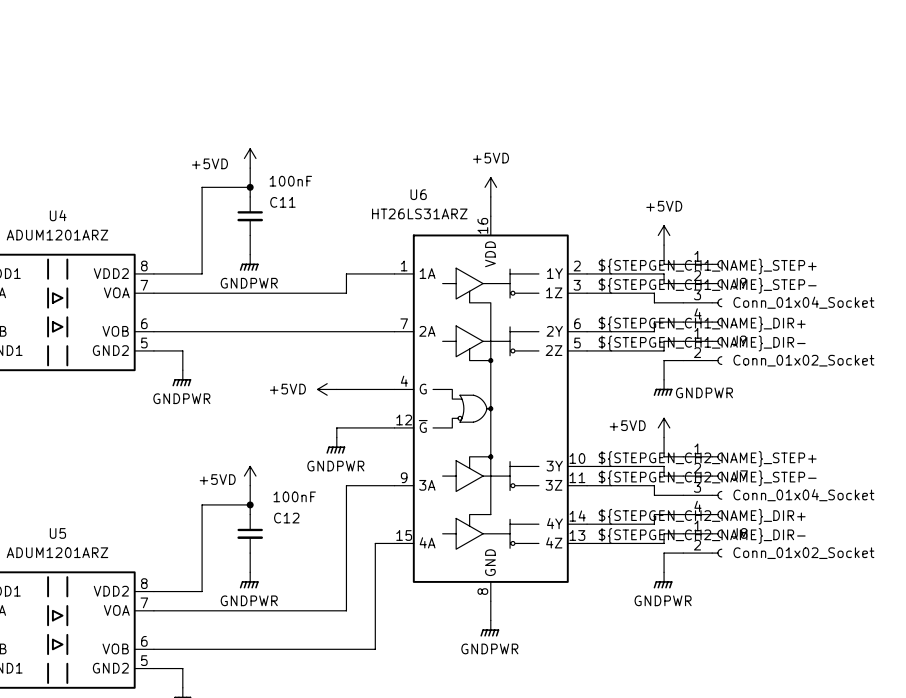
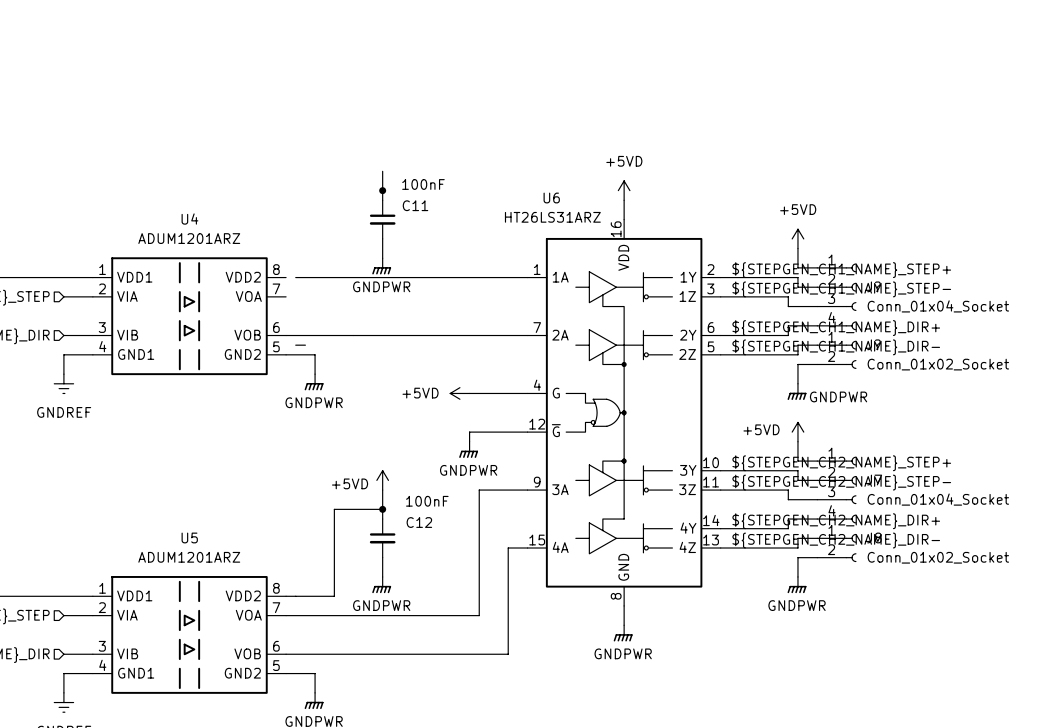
power symbol: +5VD (250, 158) -> none
wire: (250, 187) (202, 187) (202, 273) -> none
wire: (153, 273) (163, 273) -> (295, 345) (305, 345)
wire: (346, 273) (346, 293) (153, 293) -> (479, 277) (334, 277)

